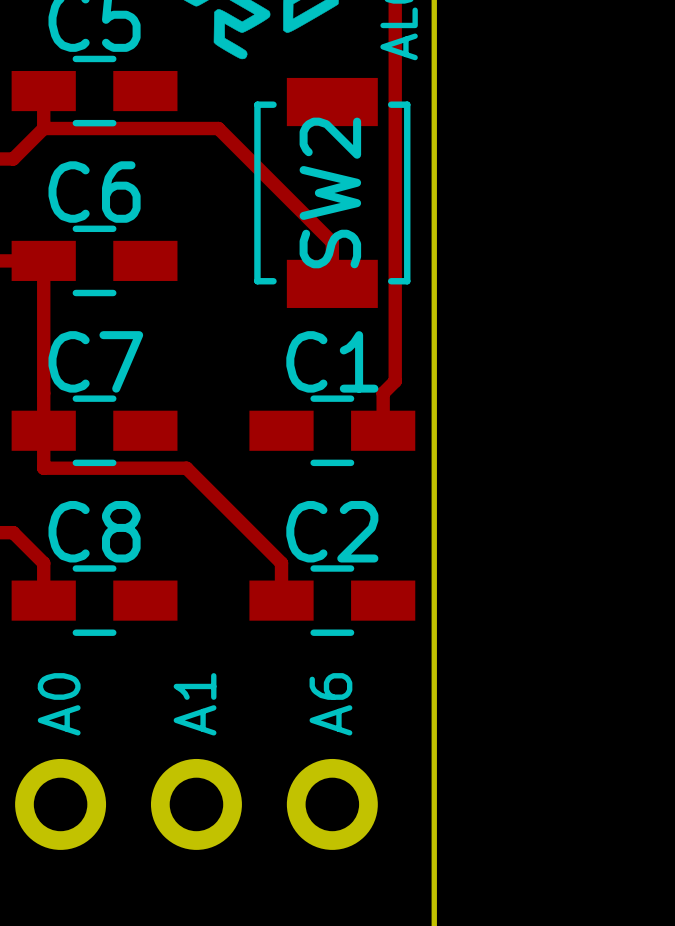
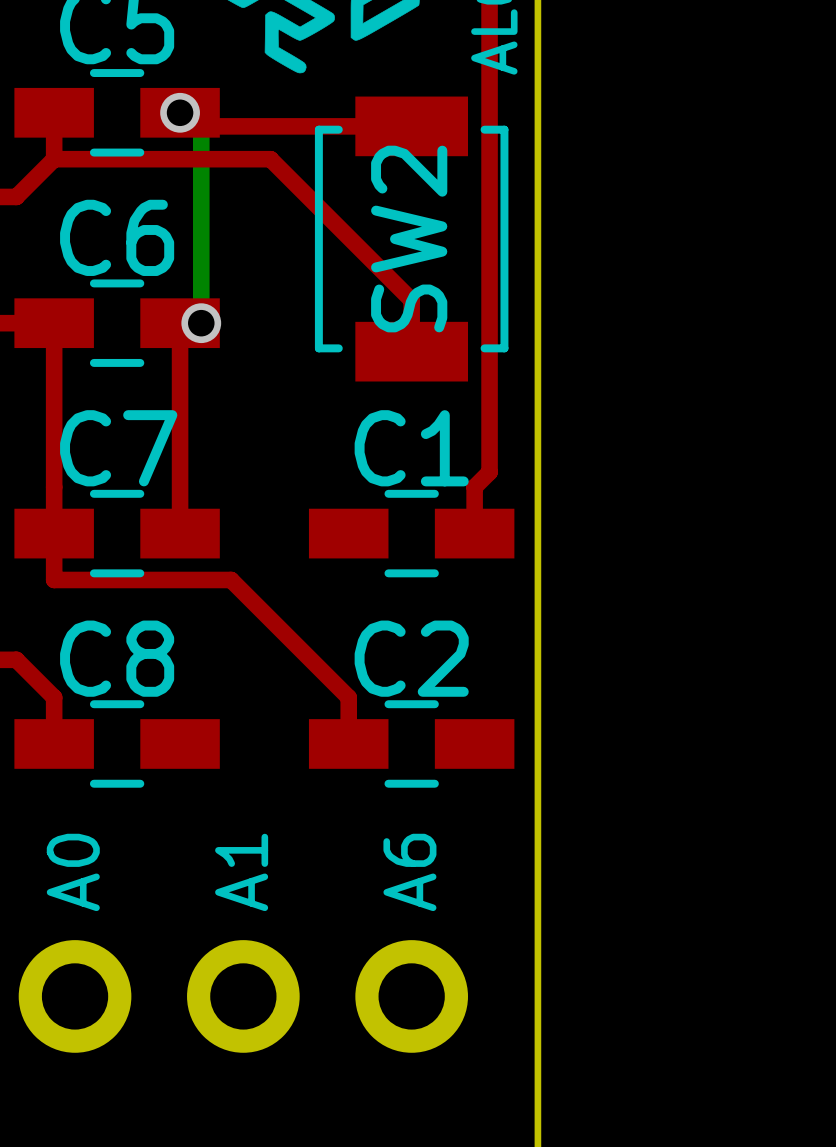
top track: none -> (180, 112) (193, 126) (411, 126)
bottom track: none -> (180, 112) (201, 133) (201, 323)
via: none -> (180, 112)
top track: none -> (201, 323) (180, 323) (180, 533)
via: none -> (201, 323)

